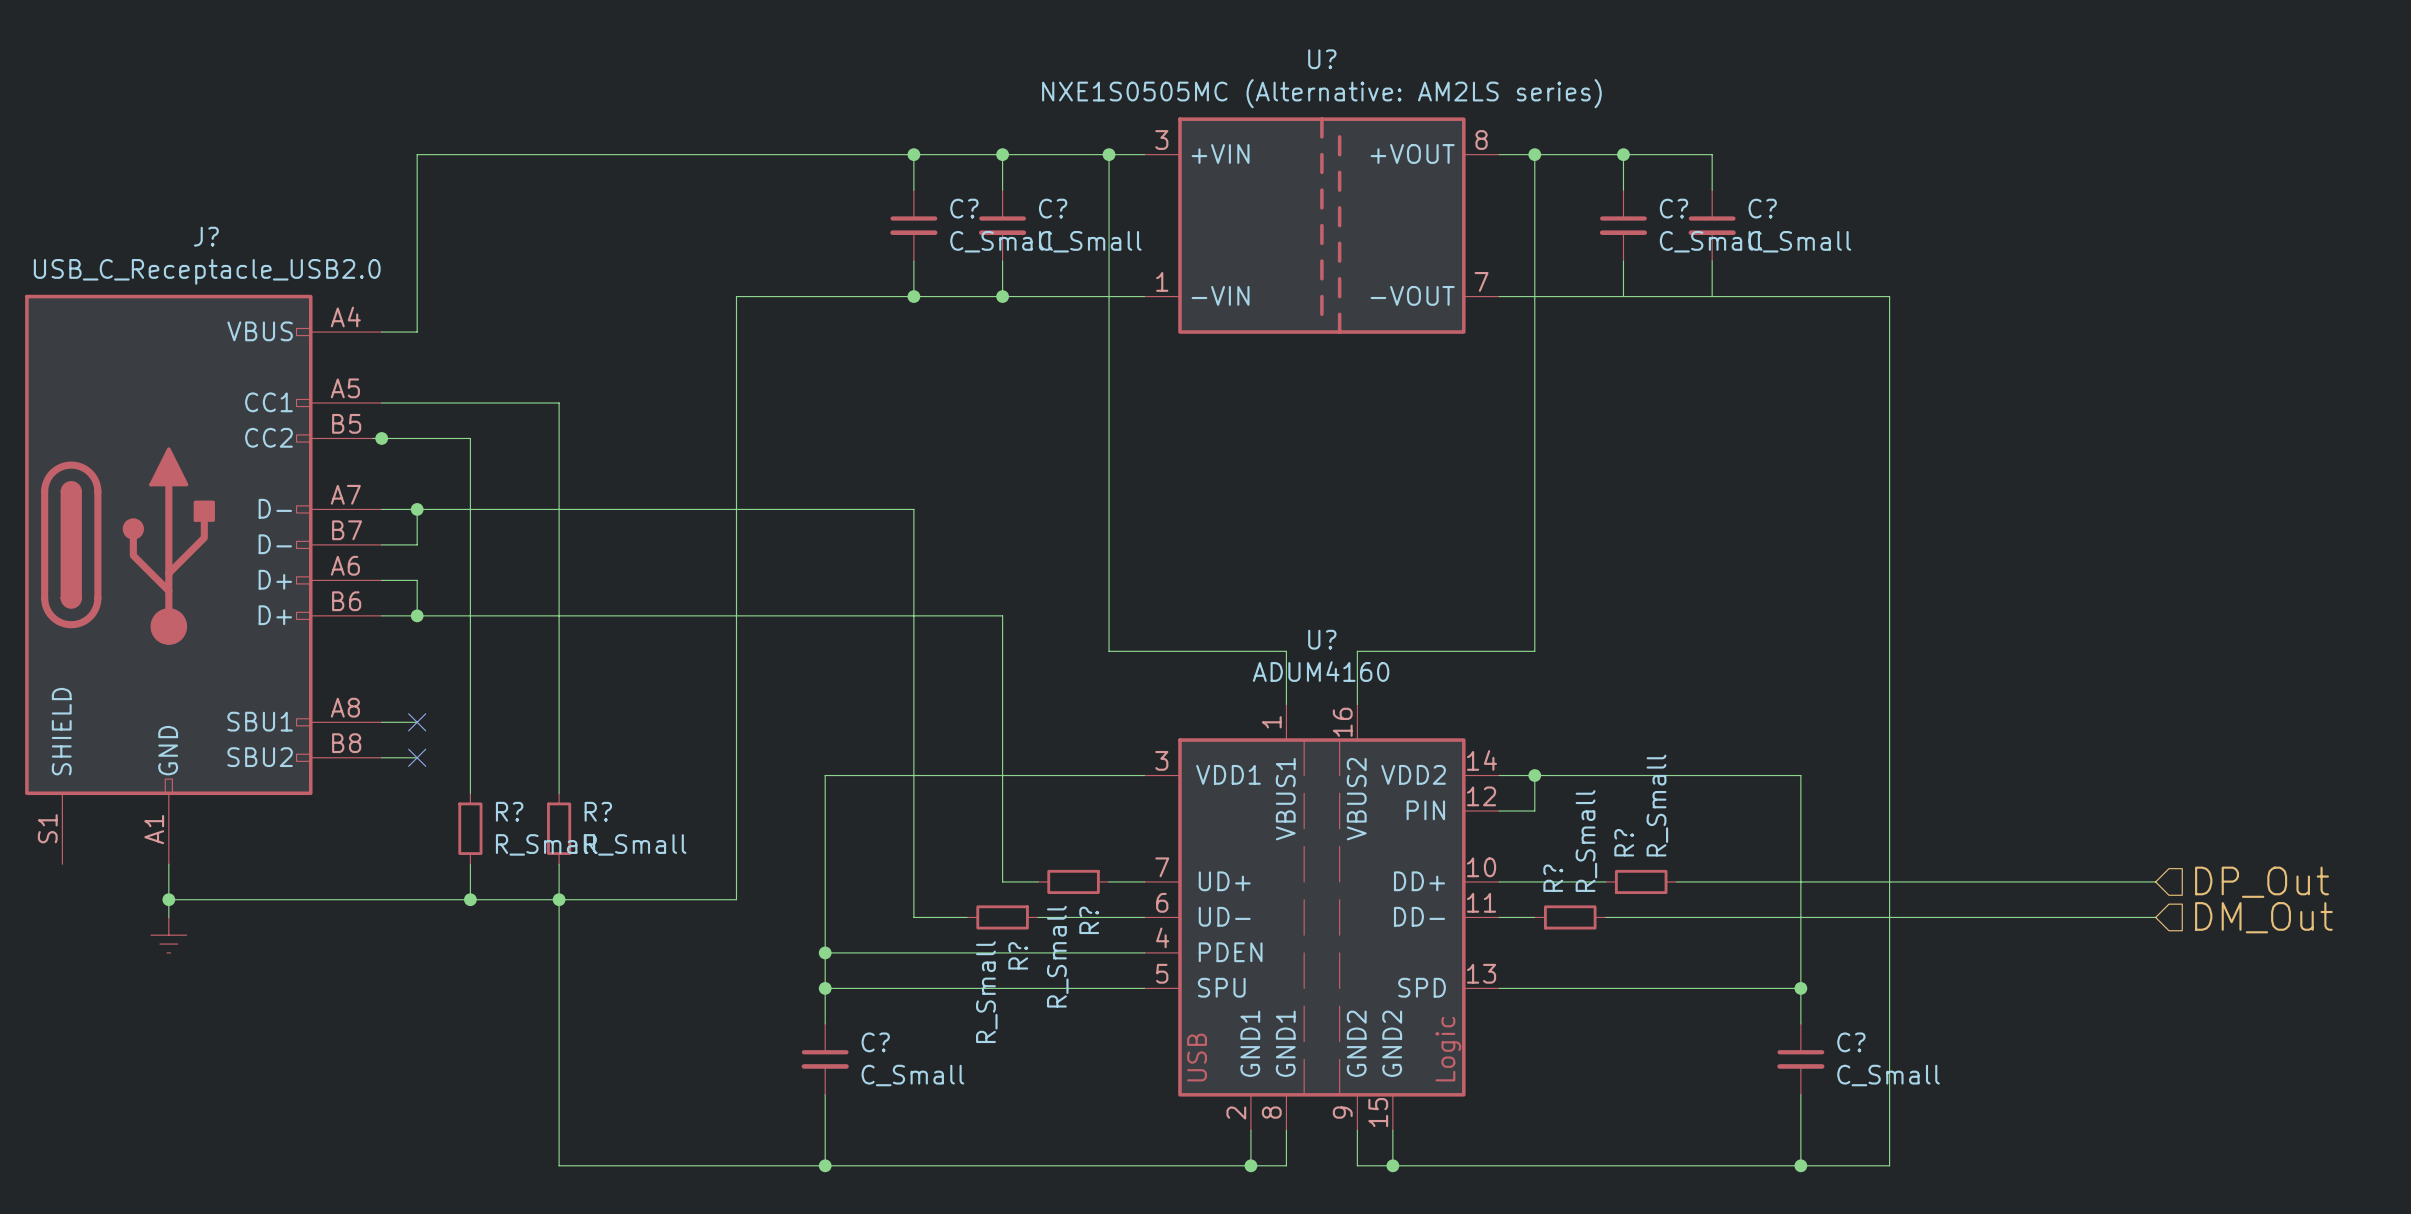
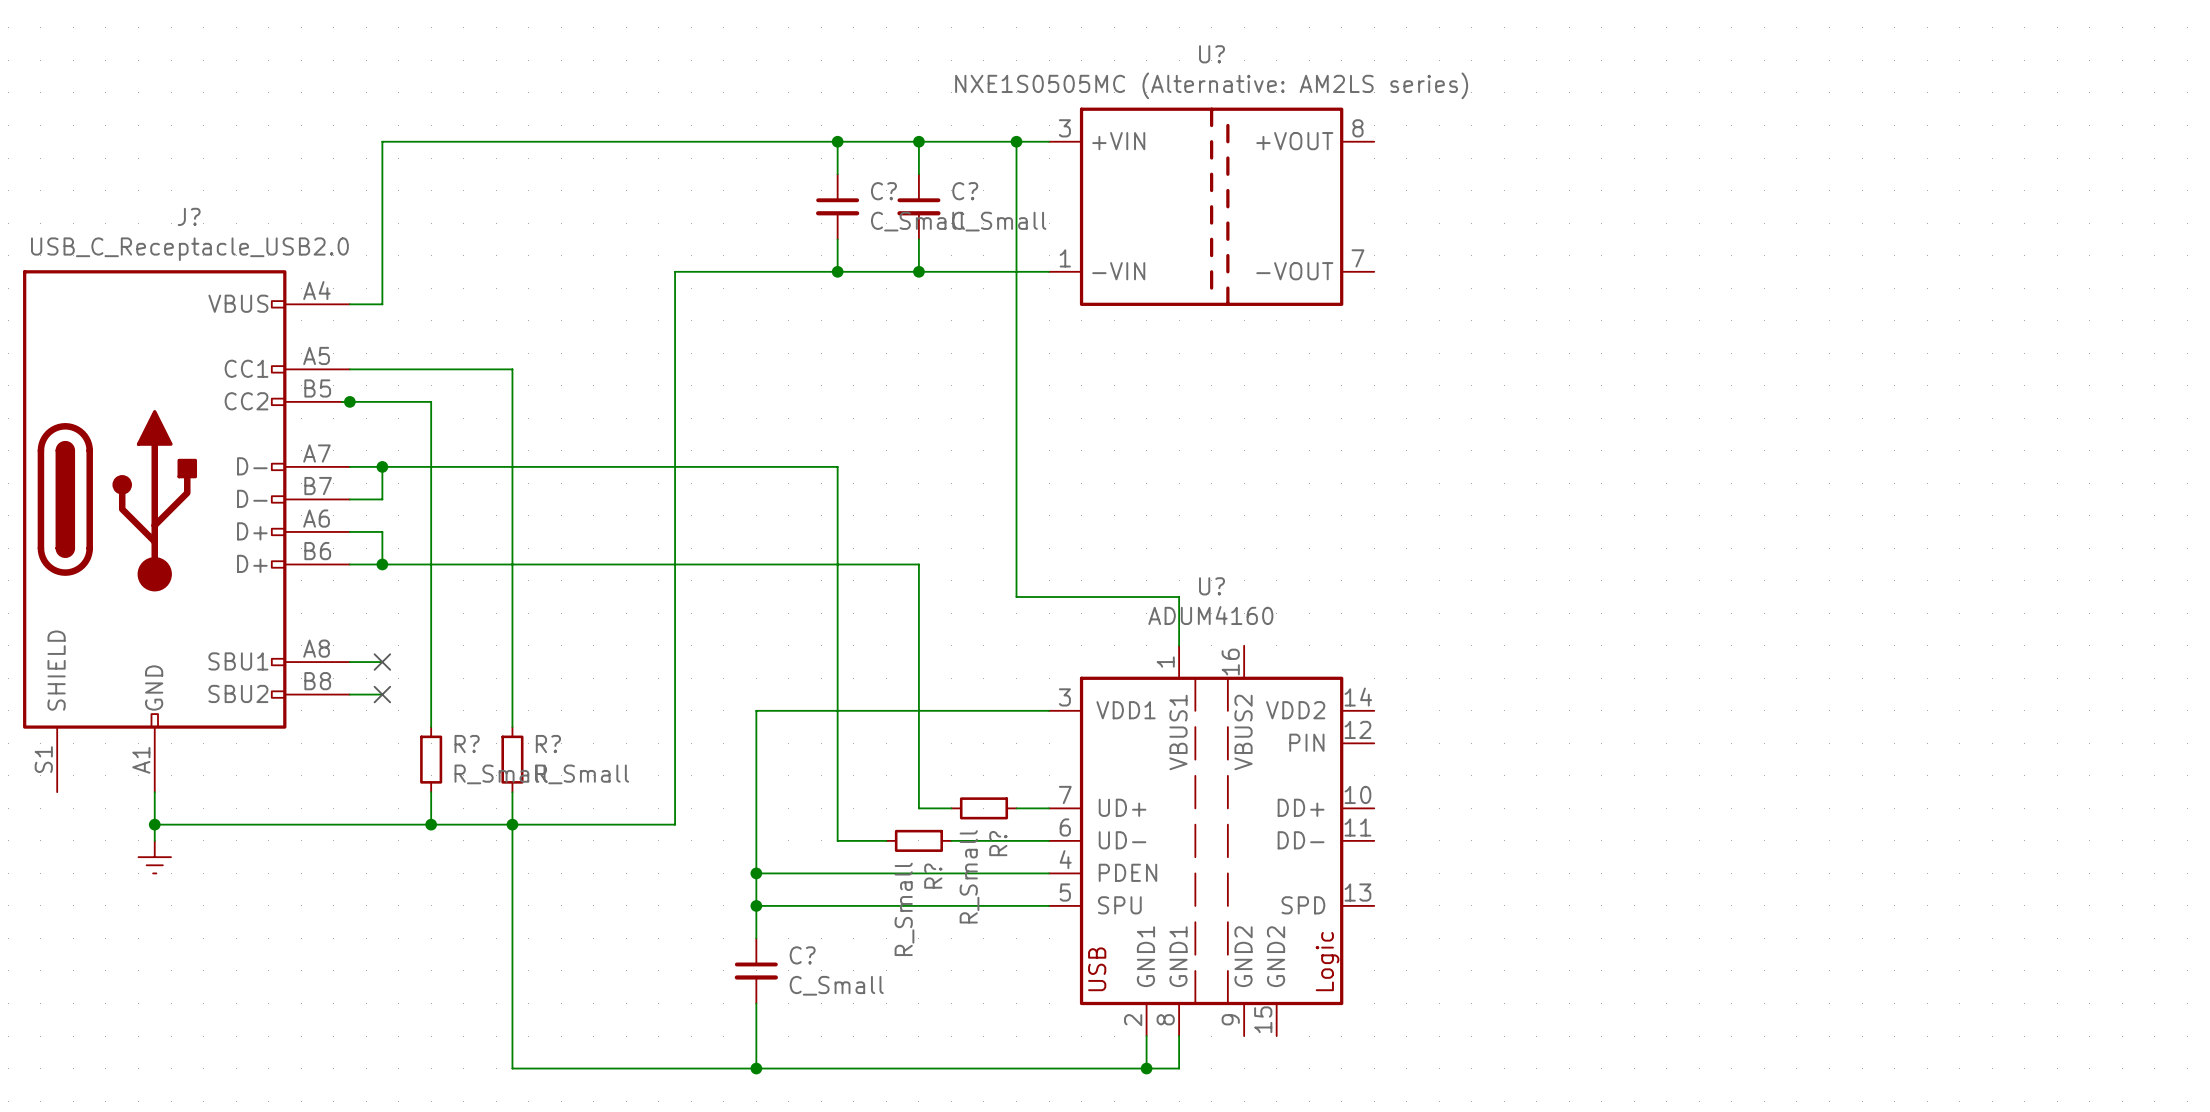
wire: (1499, 154) (1712, 154) (1712, 190) -> none
wire: (1534, 154) (1534, 651) (1357, 651) (1357, 704) -> none
junction: (1534, 154) -> none
wire: (1623, 154) (1623, 190) -> none
junction: (1623, 154) -> none
C?: C_Small (1623, 225) -> none
C?: C_Small (1712, 225) -> none
wire: (1623, 261) (1623, 296) -> none
wire: (1712, 261) (1712, 296) -> none
wire: (1499, 296) (1889, 296) (1889, 1165) (1357, 1165) (1357, 1130) -> none
wire: (1499, 775) (1800, 775) (1800, 1023) -> none
wire: (1534, 775) (1534, 811) (1499, 811) -> none
junction: (1534, 775) -> none
wire: (1499, 881) (1605, 881) -> none
R?: R_Small (1641, 881) -> none
wire: (1676, 881) (2155, 881) -> none
hierarchical label: DP_Out (2262, 882) -> none
wire: (1499, 917) (1534, 917) -> none
R?: R_Small (1570, 917) -> none
wire: (1605, 917) (2155, 917) -> none
hierarchical label: DM_Out (2263, 917) -> none
wire: (1499, 988) (1800, 988) -> none
junction: (1800, 988) -> none
C?: C_Small (1800, 1059) -> none
wire: (1800, 1094) (1800, 1165) -> none
wire: (1392, 1130) (1392, 1165) -> none
junction: (1392, 1165) -> none
junction: (1800, 1165) -> none

